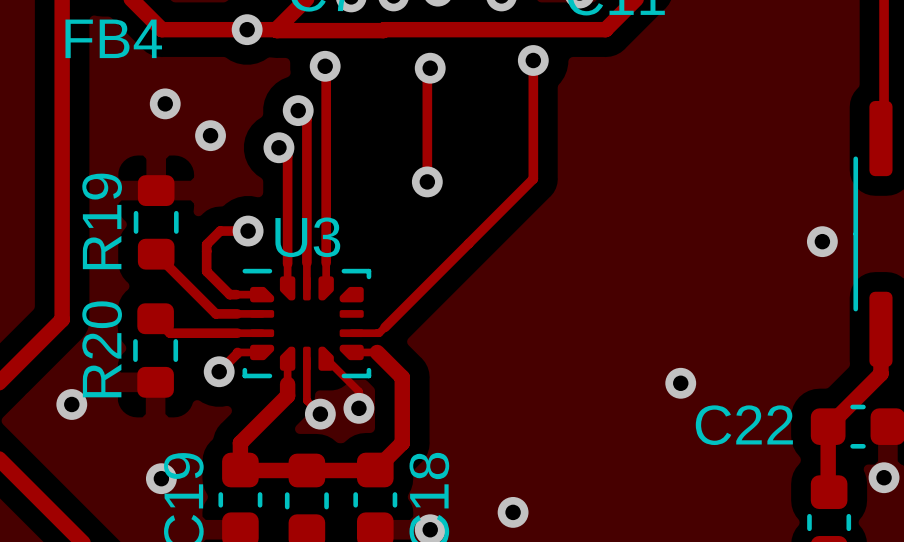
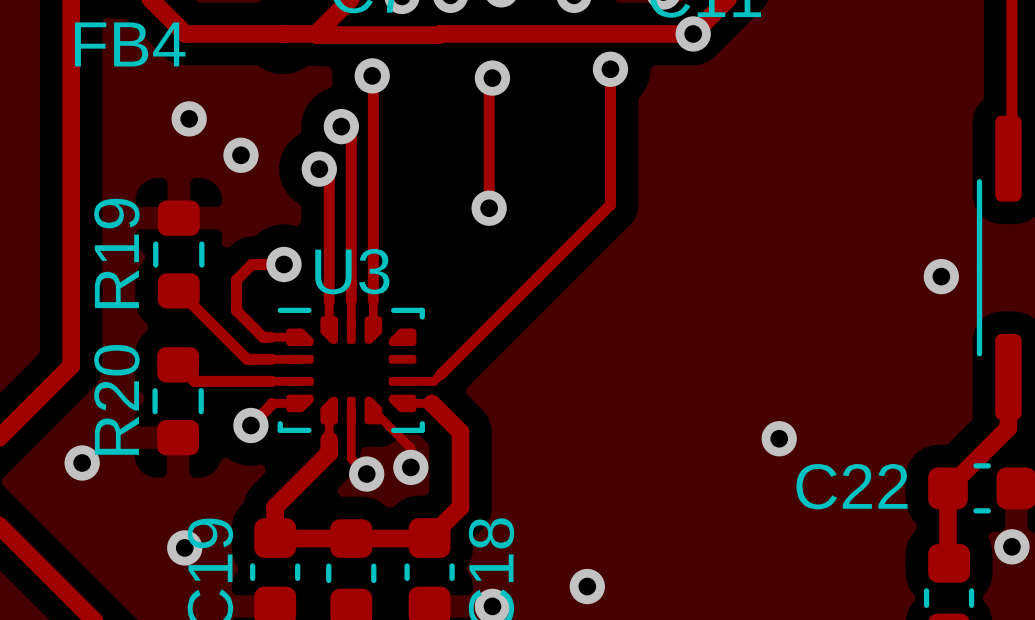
via: (247, 29) -> none
via: none -> (693, 33)

